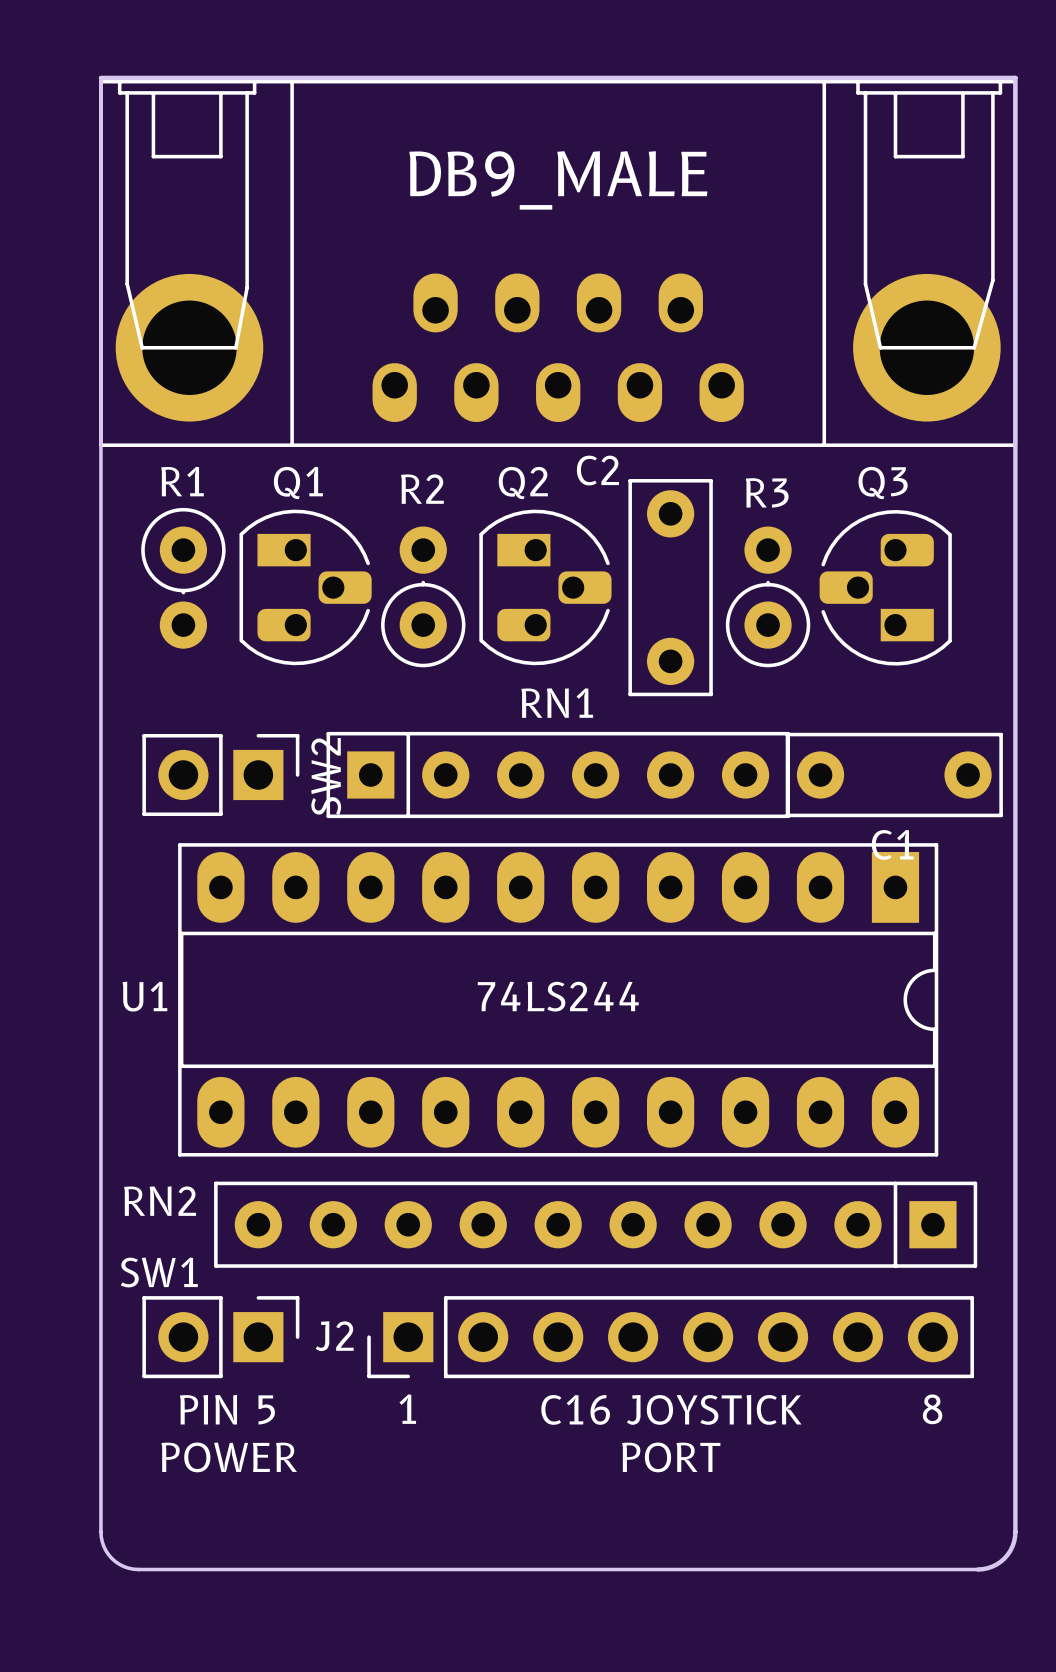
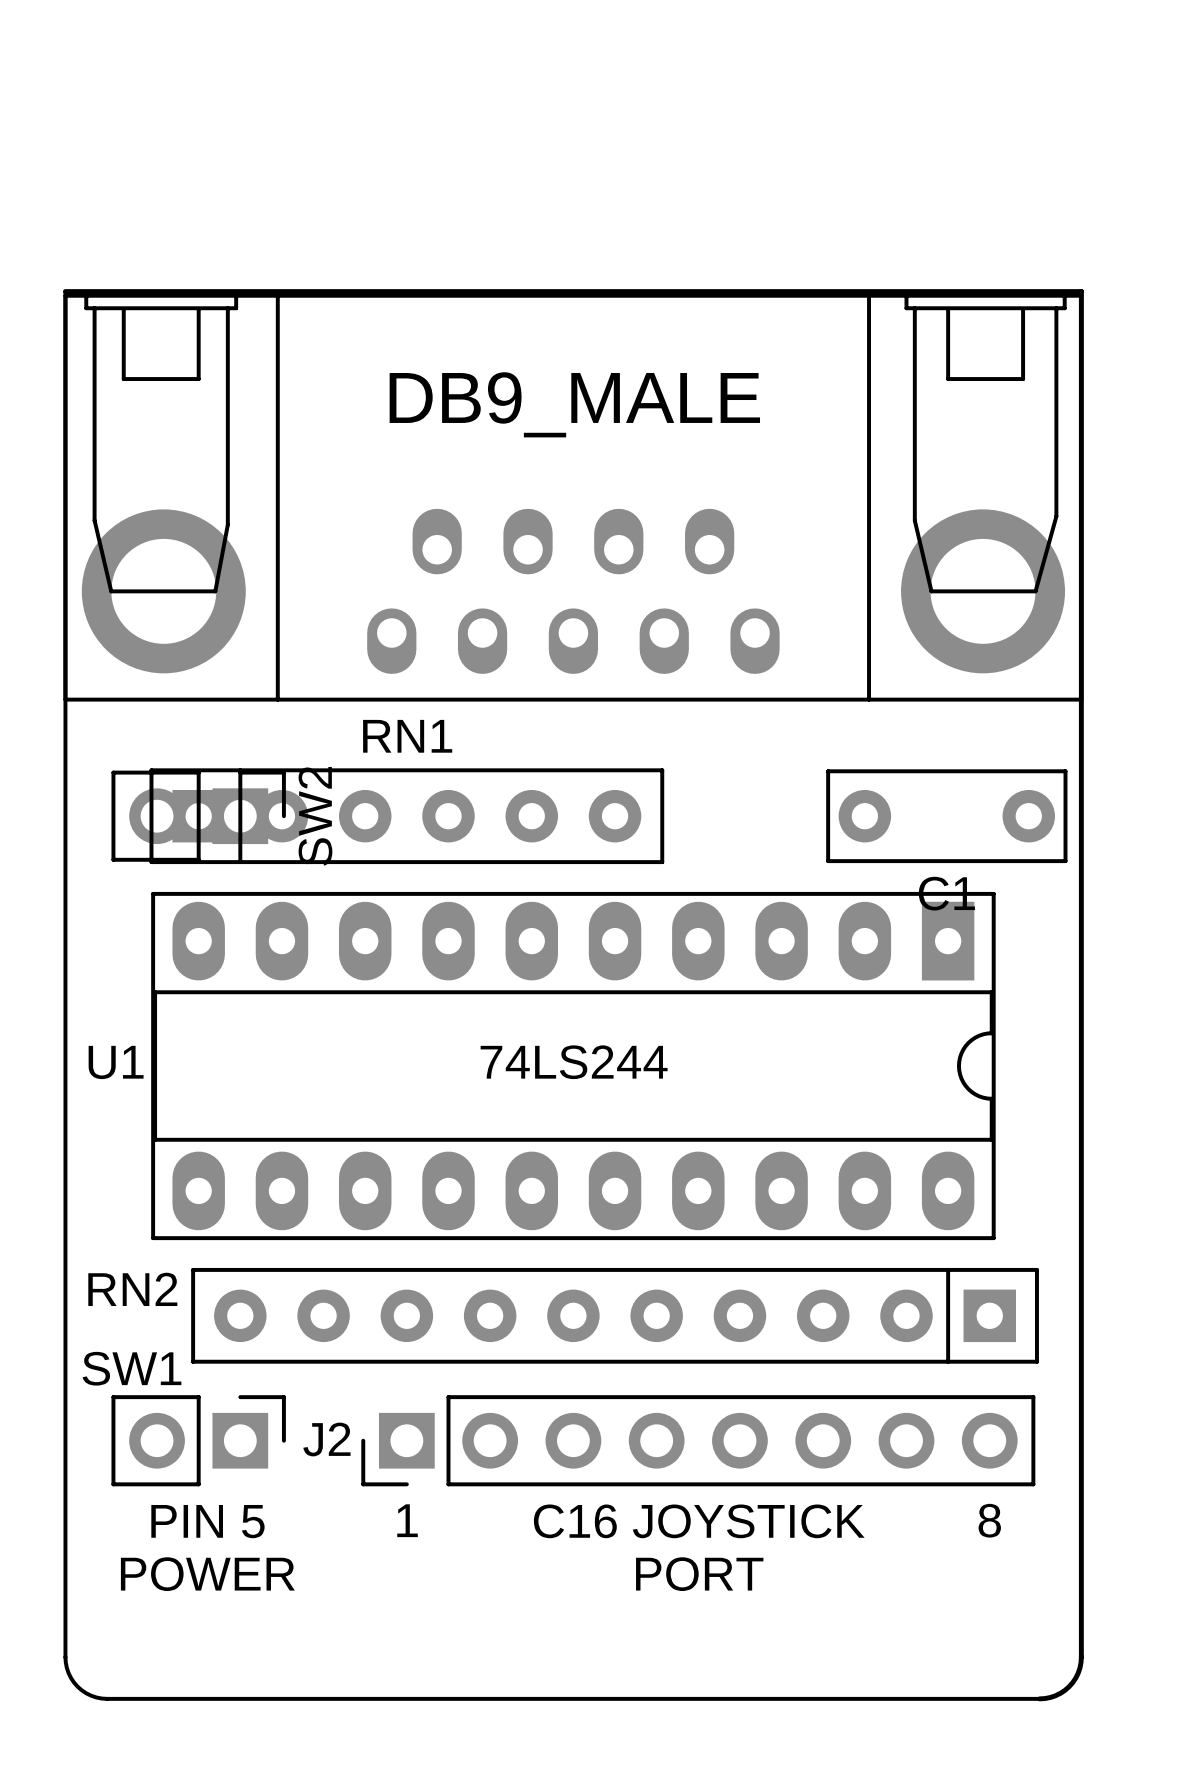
part position: (558, 263) -> (573, 497)
board edge: (100, 302) (100, 77) (1015, 77) (1015, 302) -> (65, 291) (1081, 291)
R1: (183, 578) -> none
Q1: (305, 587) -> none
Q2: (545, 587) -> none
C2: (670, 587) -> none
Q3: (885, 587) -> none
R2: (423, 596) -> none
R3: (768, 596) -> none
RN1 position: (558, 774) -> (406, 816)

